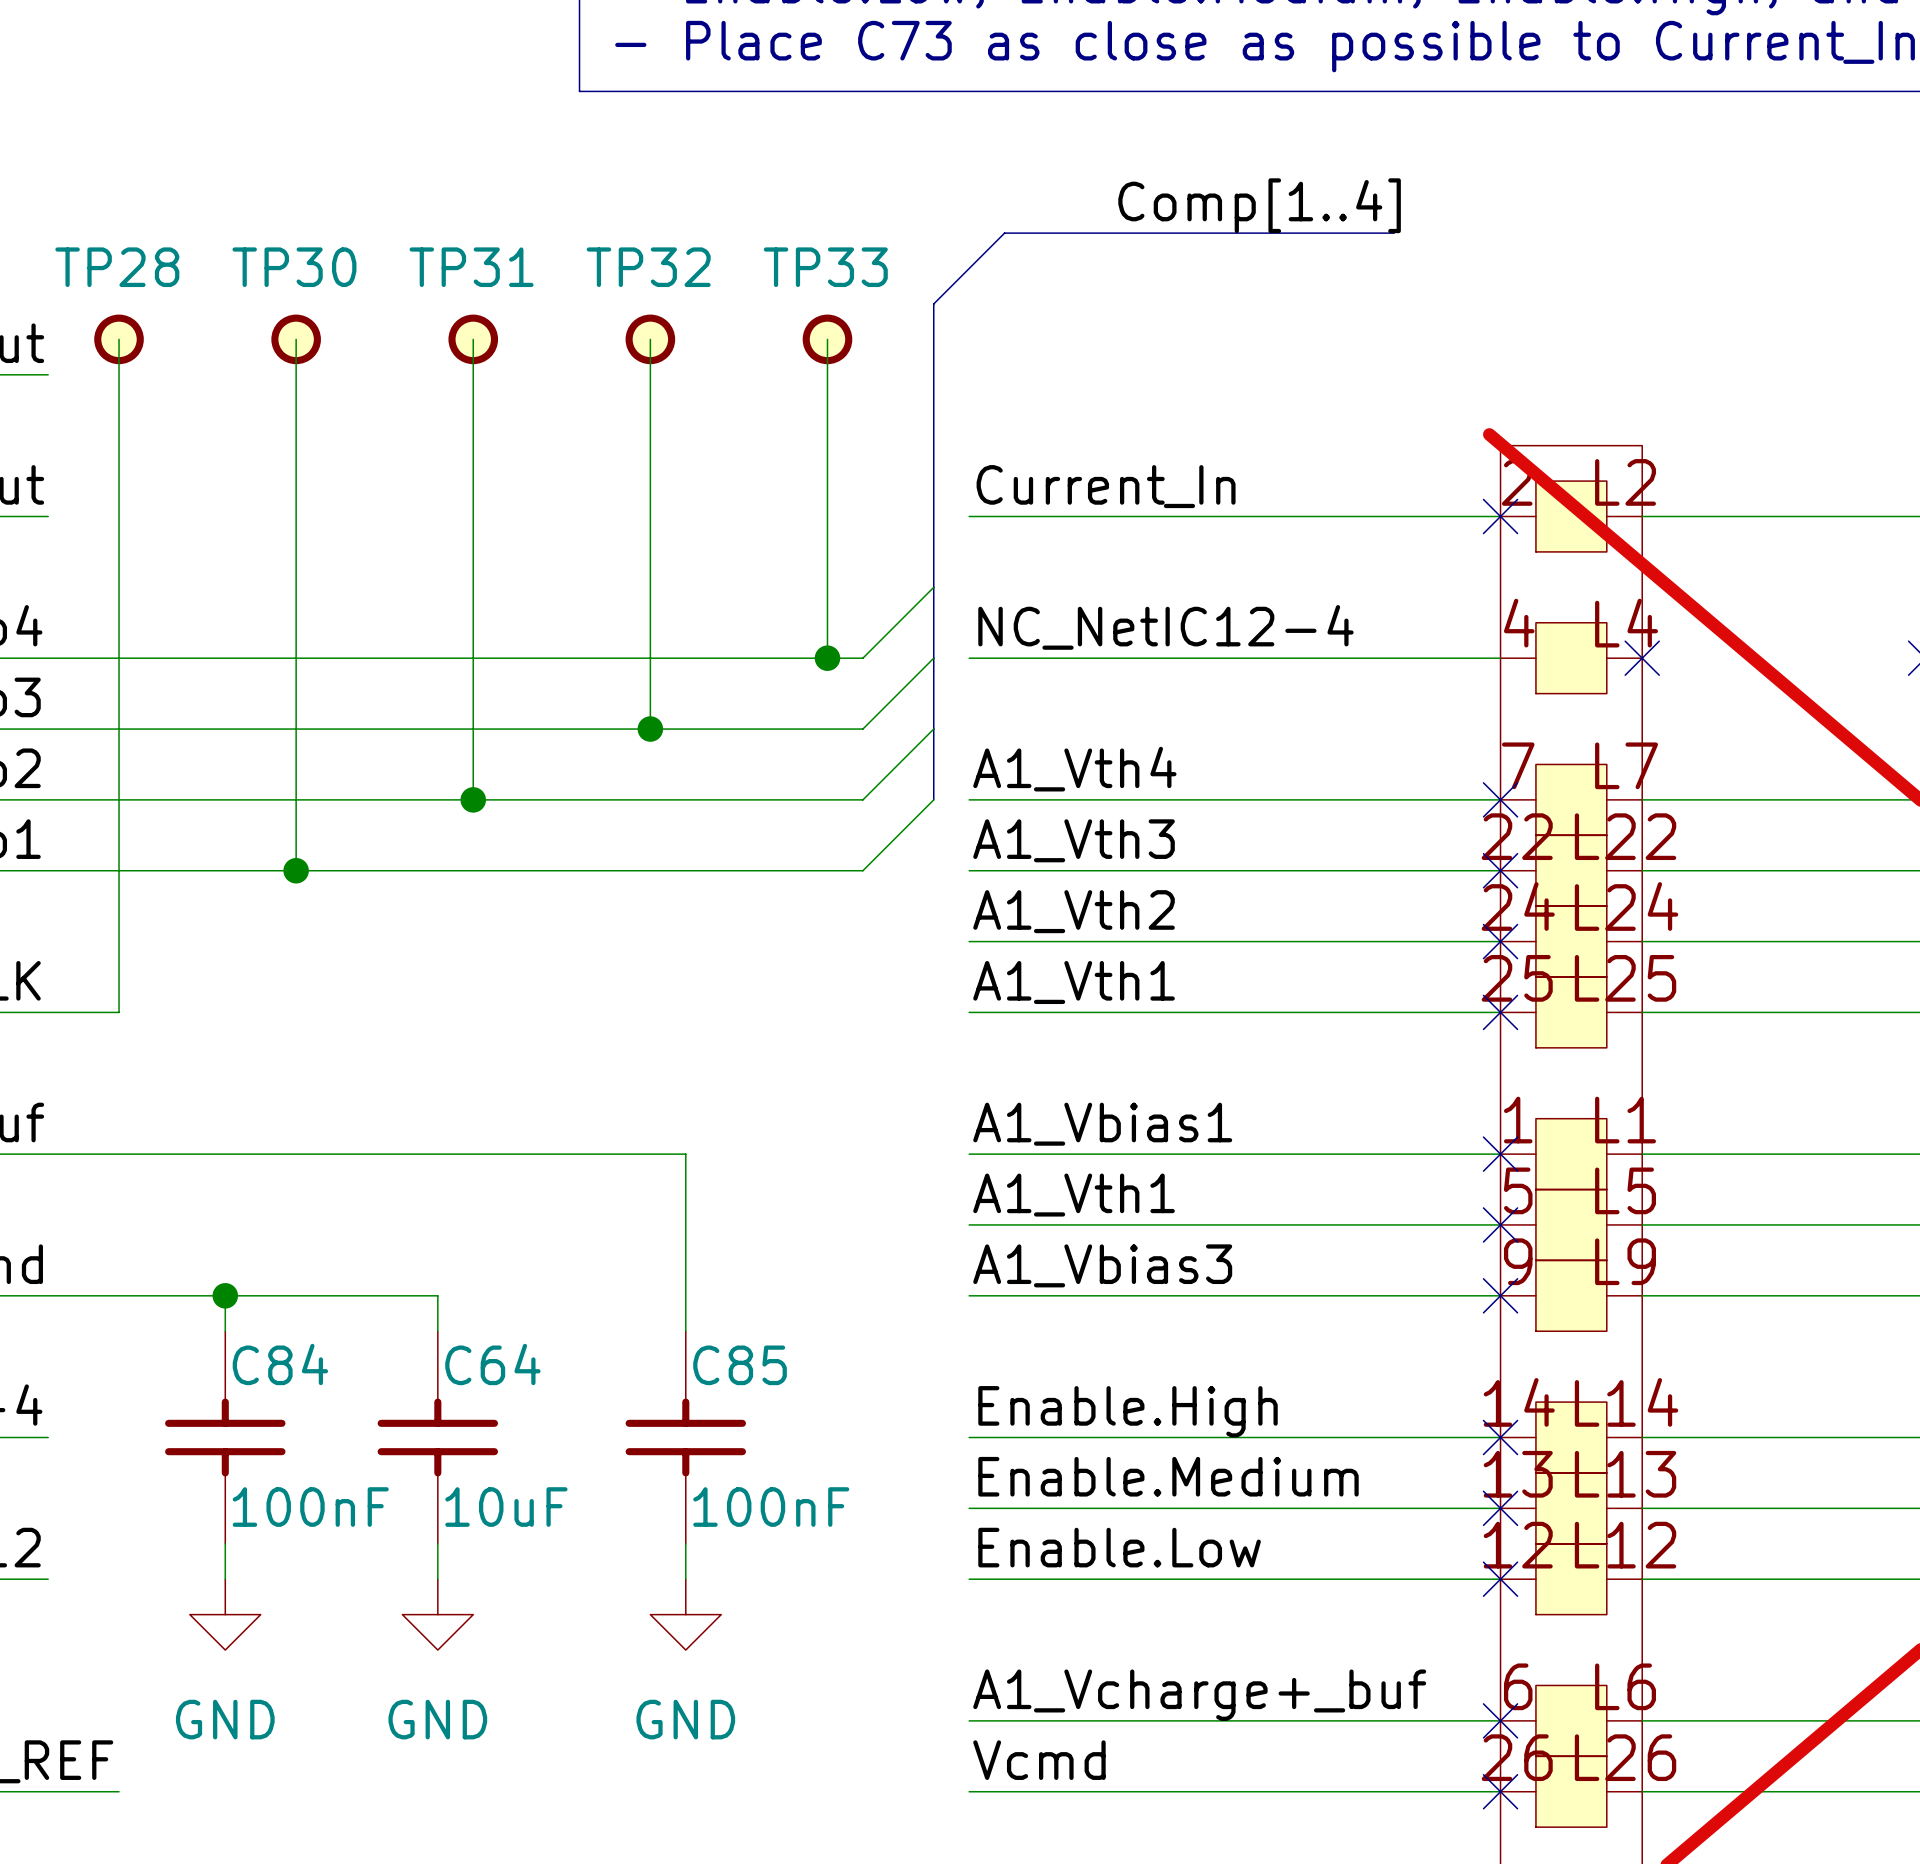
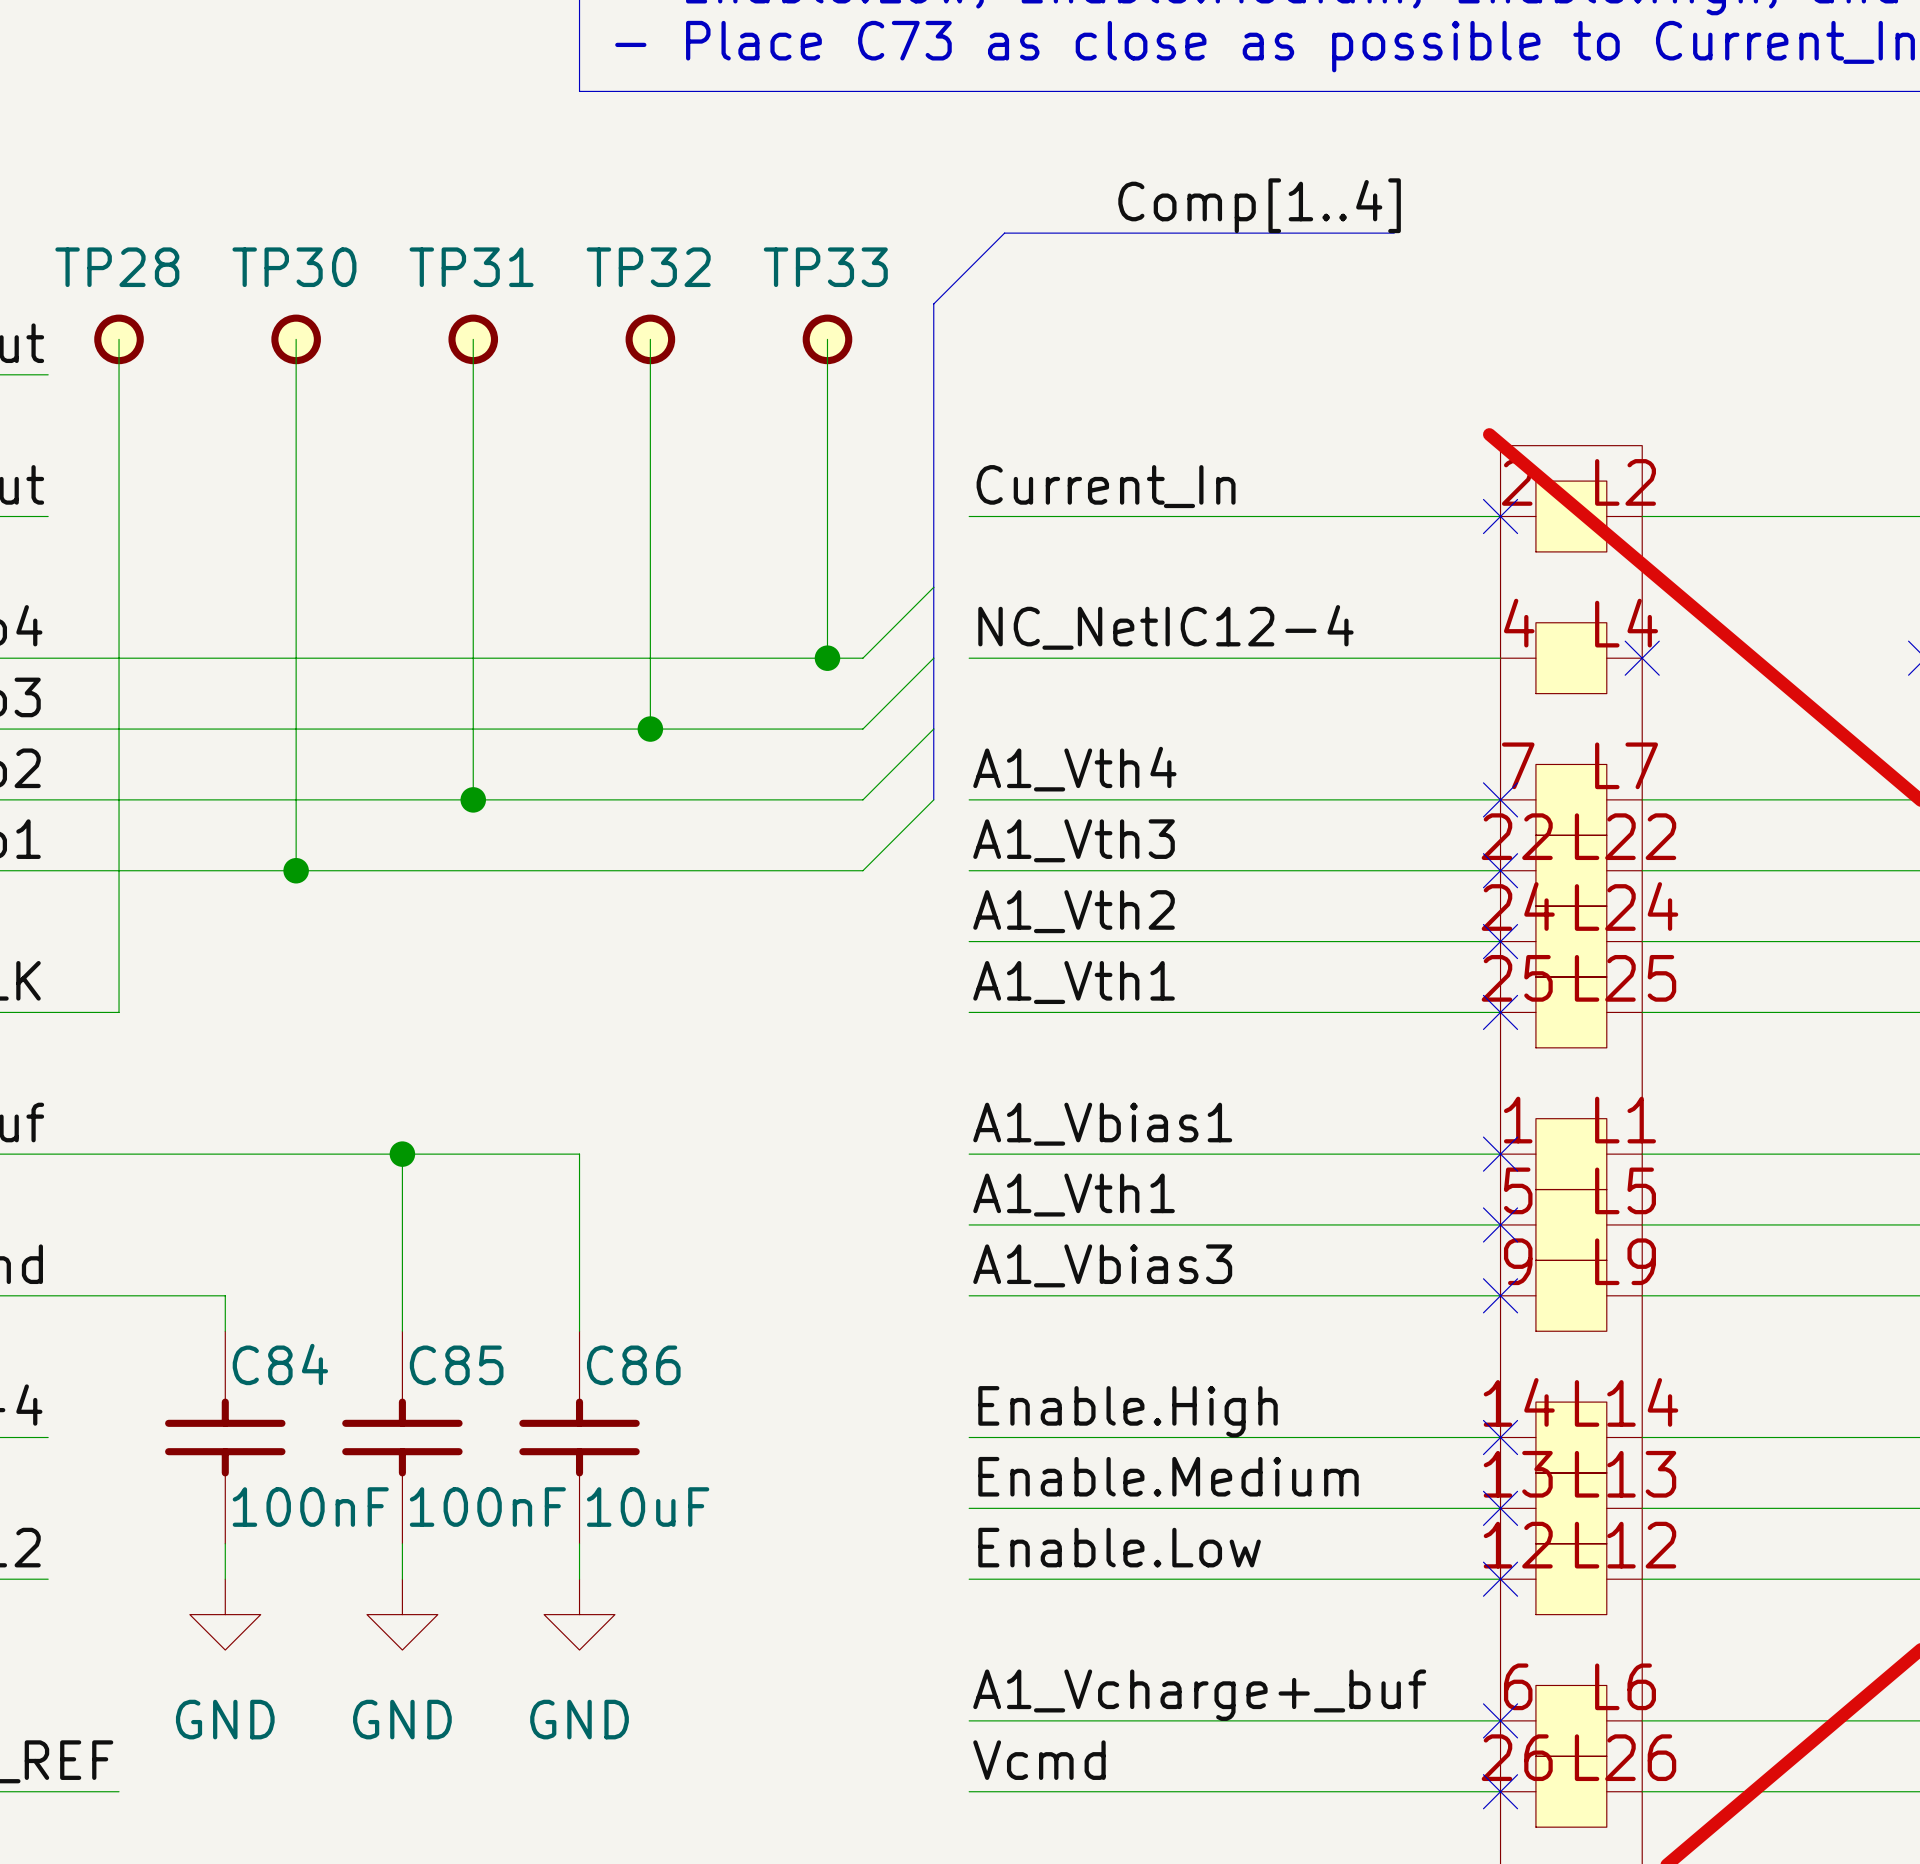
wire: none -> (402, 1154) (402, 1331)
junction: none -> (402, 1154)
wire: (579, 1154) (685, 1154) (685, 1331) -> (579, 1154) (579, 1331)
wire: (225, 1295) (437, 1295) (437, 1331) -> none
junction: (225, 1295) -> none
C64: (437, 1437) -> none
C86: none -> (579, 1437)
C85 position: (685, 1437) -> (402, 1437)
wire: (437, 1543) (437, 1579) -> (402, 1543) (402, 1579)
wire: (685, 1543) (685, 1579) -> (579, 1543) (579, 1579)
power symbol position: GND (437, 1614) -> GND (402, 1614)
power symbol: none -> GND (579, 1614)
power symbol: GND (685, 1614) -> none

